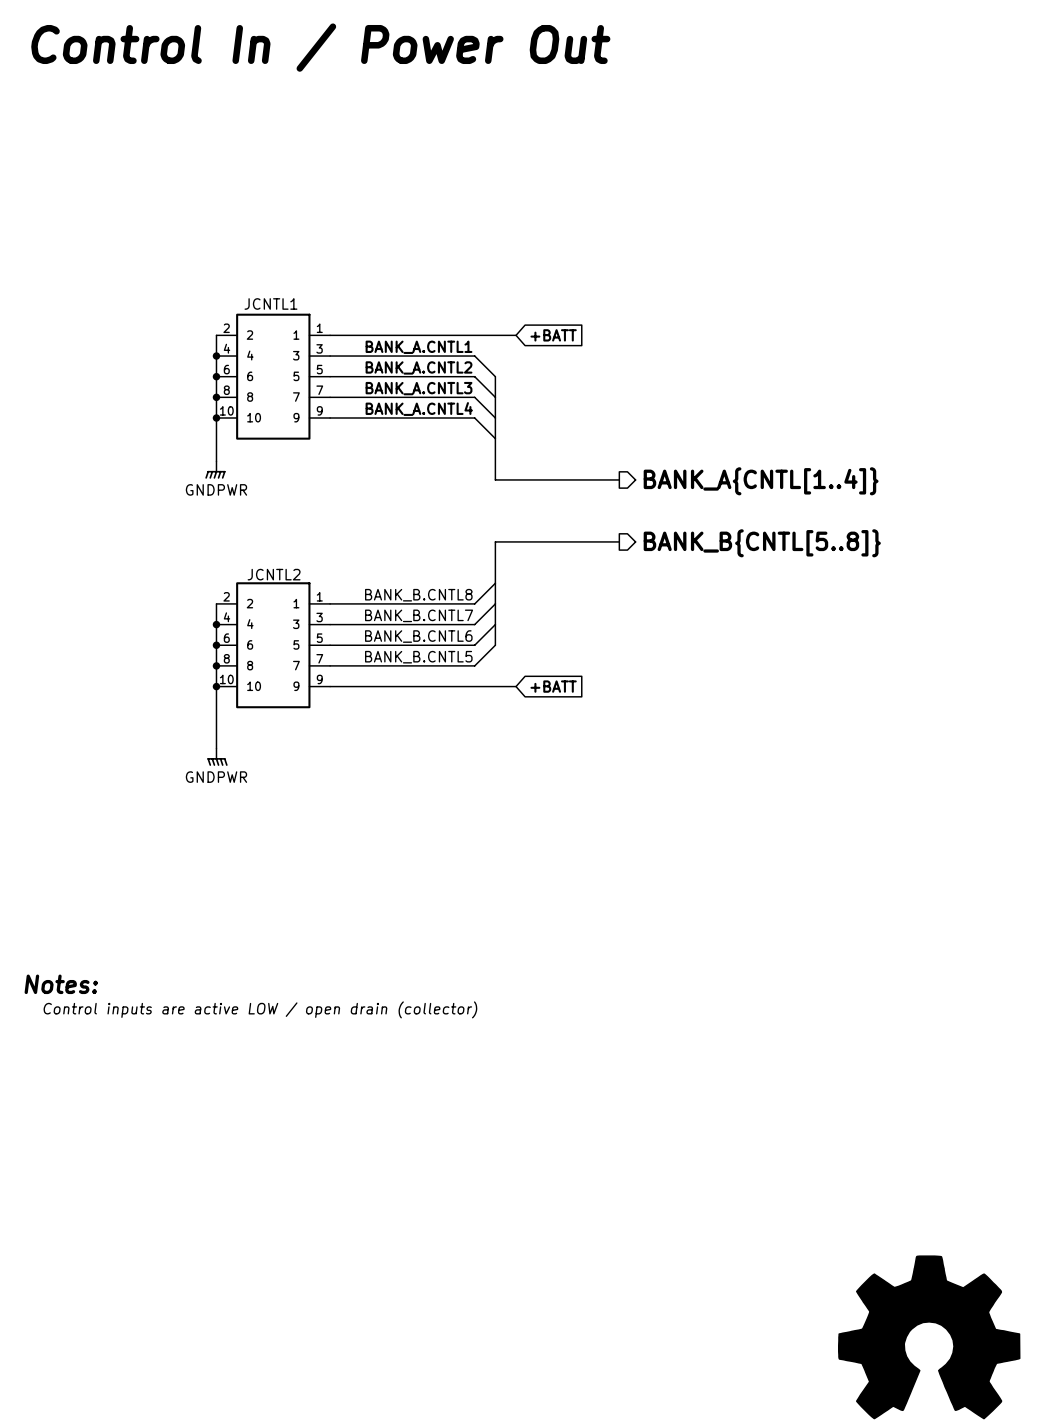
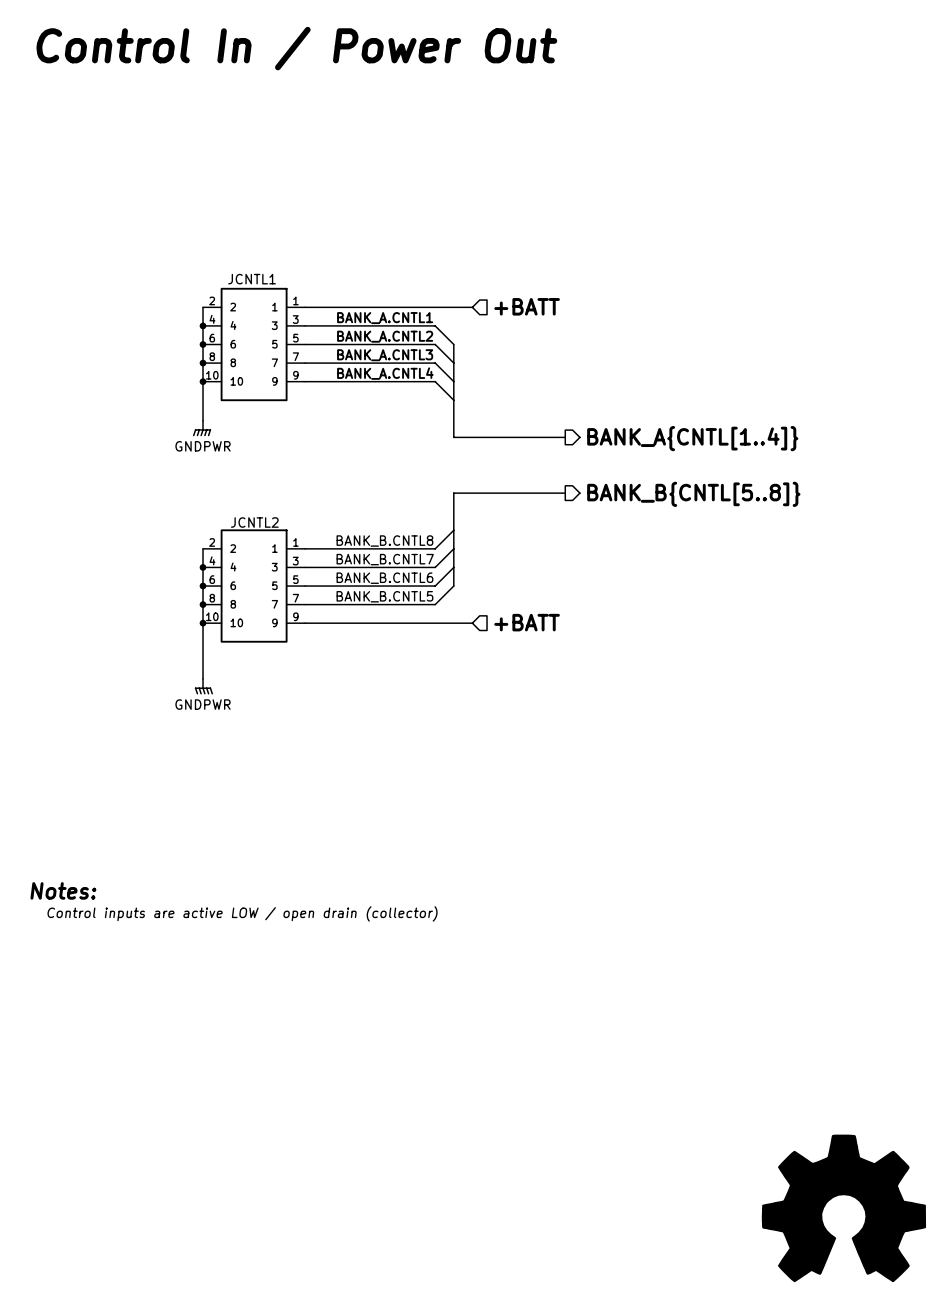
hierarchical label: none -> +BATT (527, 306)
global label: +BATT (553, 335) -> none
hierarchical label: none -> +BATT (527, 622)
global label: +BATT (553, 686) -> none

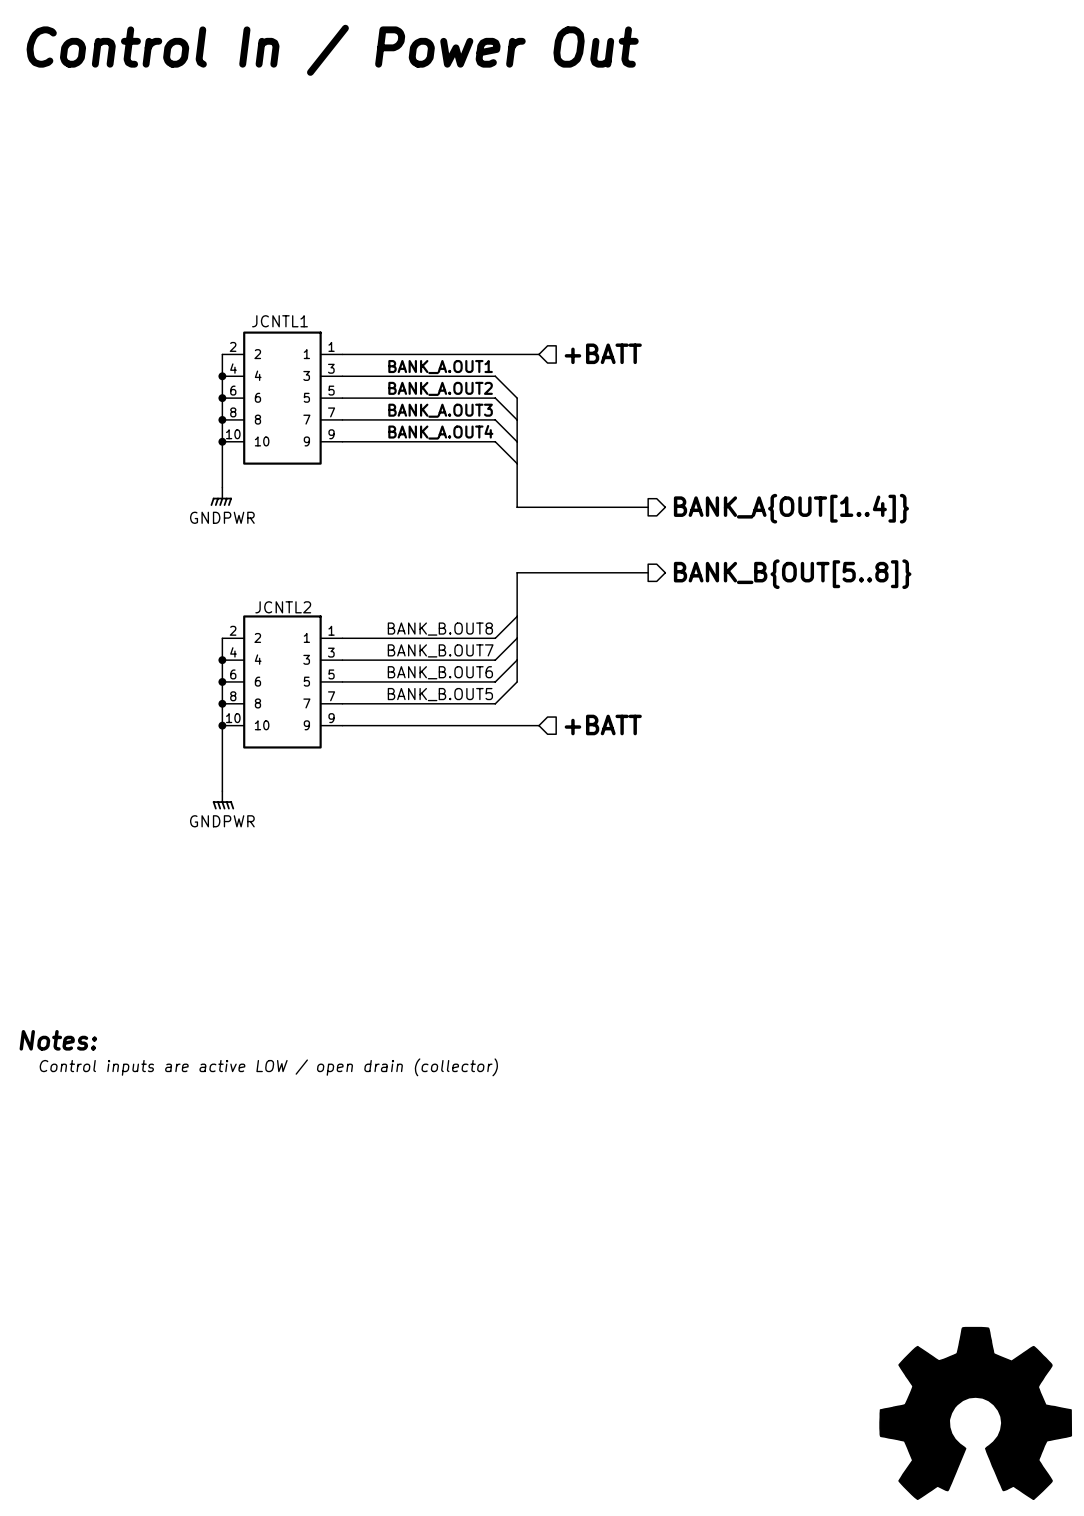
label: BANK_A.CNTL1 (385, 318) -> BANK_A.OUT1 (440, 367)
label: BANK_A.CNTL2 (385, 336) -> BANK_A.OUT2 (440, 388)
label: BANK_A.CNTL3 (385, 355) -> BANK_A.OUT3 (440, 410)
label: BANK_A.CNTL4 (385, 373) -> BANK_A.OUT4 (440, 432)
hierarchical label: BANK_A{CNTL[1..4]} (692, 438) -> BANK_A{OUT[1..4]} (791, 508)
hierarchical label: BANK_B{CNTL[5..8]} (693, 494) -> BANK_B{OUT[5..8]} (792, 574)
label: BANK_B.CNTL8 (384, 541) -> BANK_B.OUT8 (440, 629)
label: BANK_B.CNTL7 (385, 559) -> BANK_B.OUT7 (440, 650)
label: BANK_B.CNTL6 (384, 578) -> BANK_B.OUT6 (440, 672)
label: BANK_B.CNTL5 (384, 596) -> BANK_B.OUT5 (440, 694)

